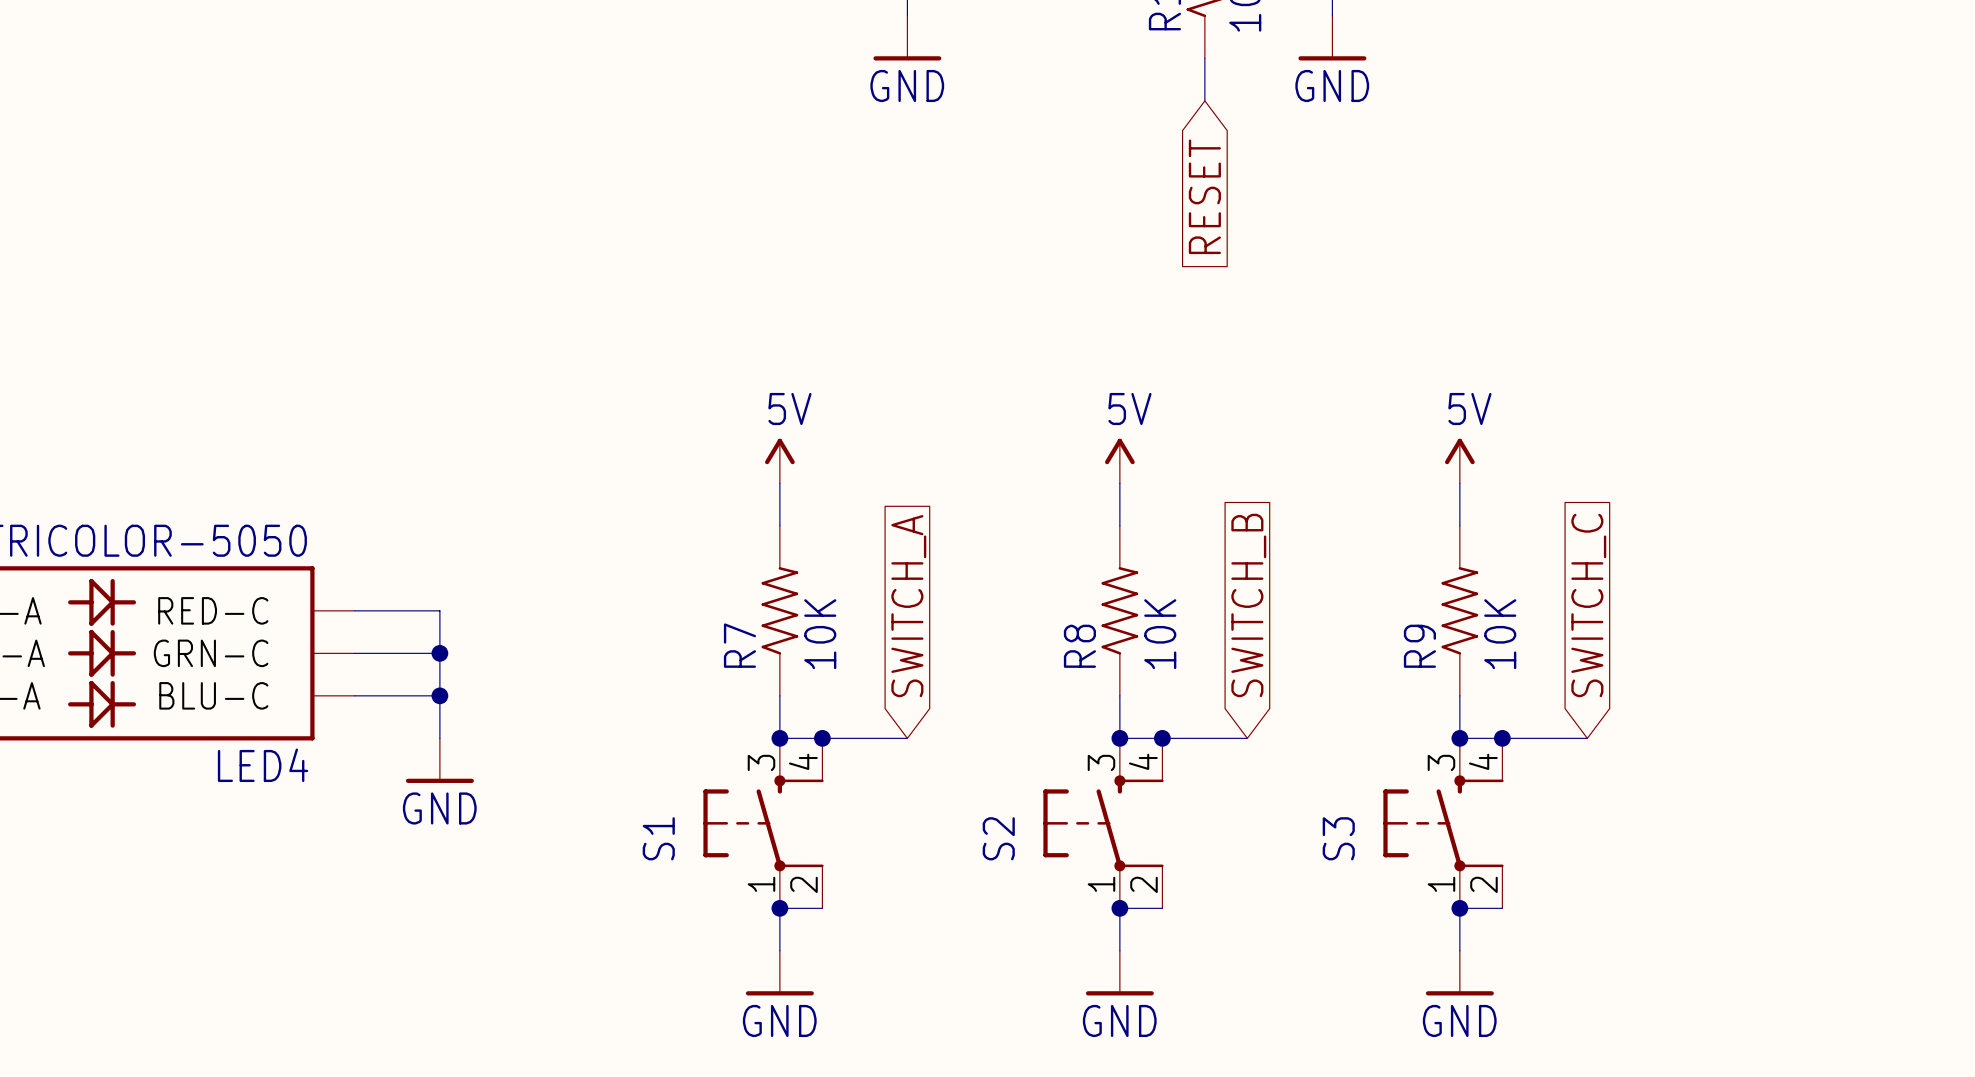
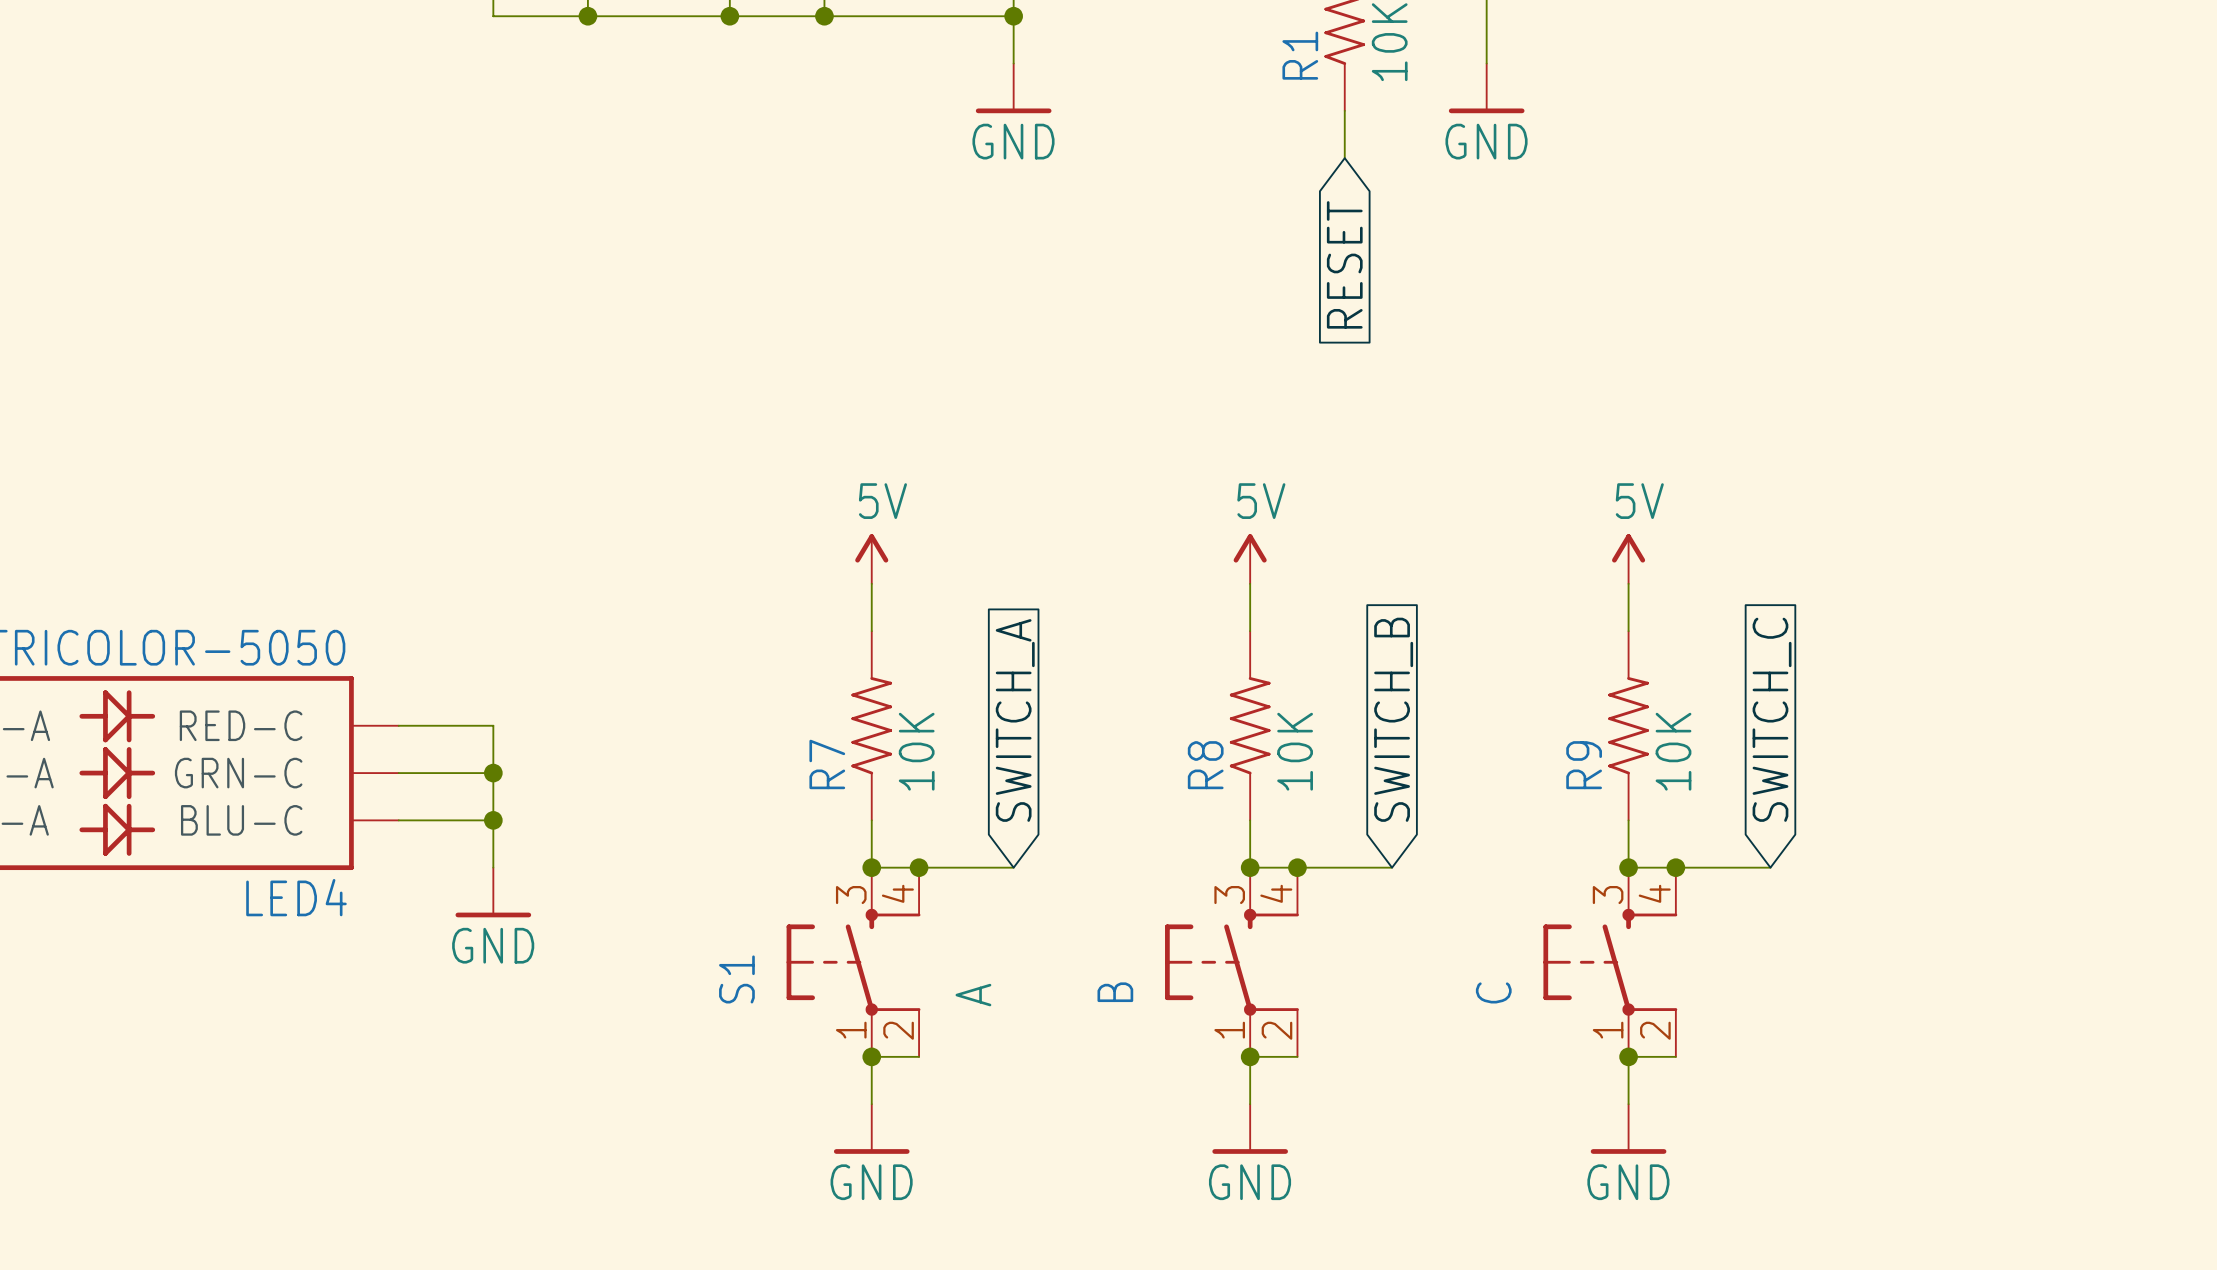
S2 name: S2 (998, 838) -> B (1115, 992)
S3 name: S3 (1338, 838) -> C (1493, 992)
S1 value: none -> A (973, 995)

